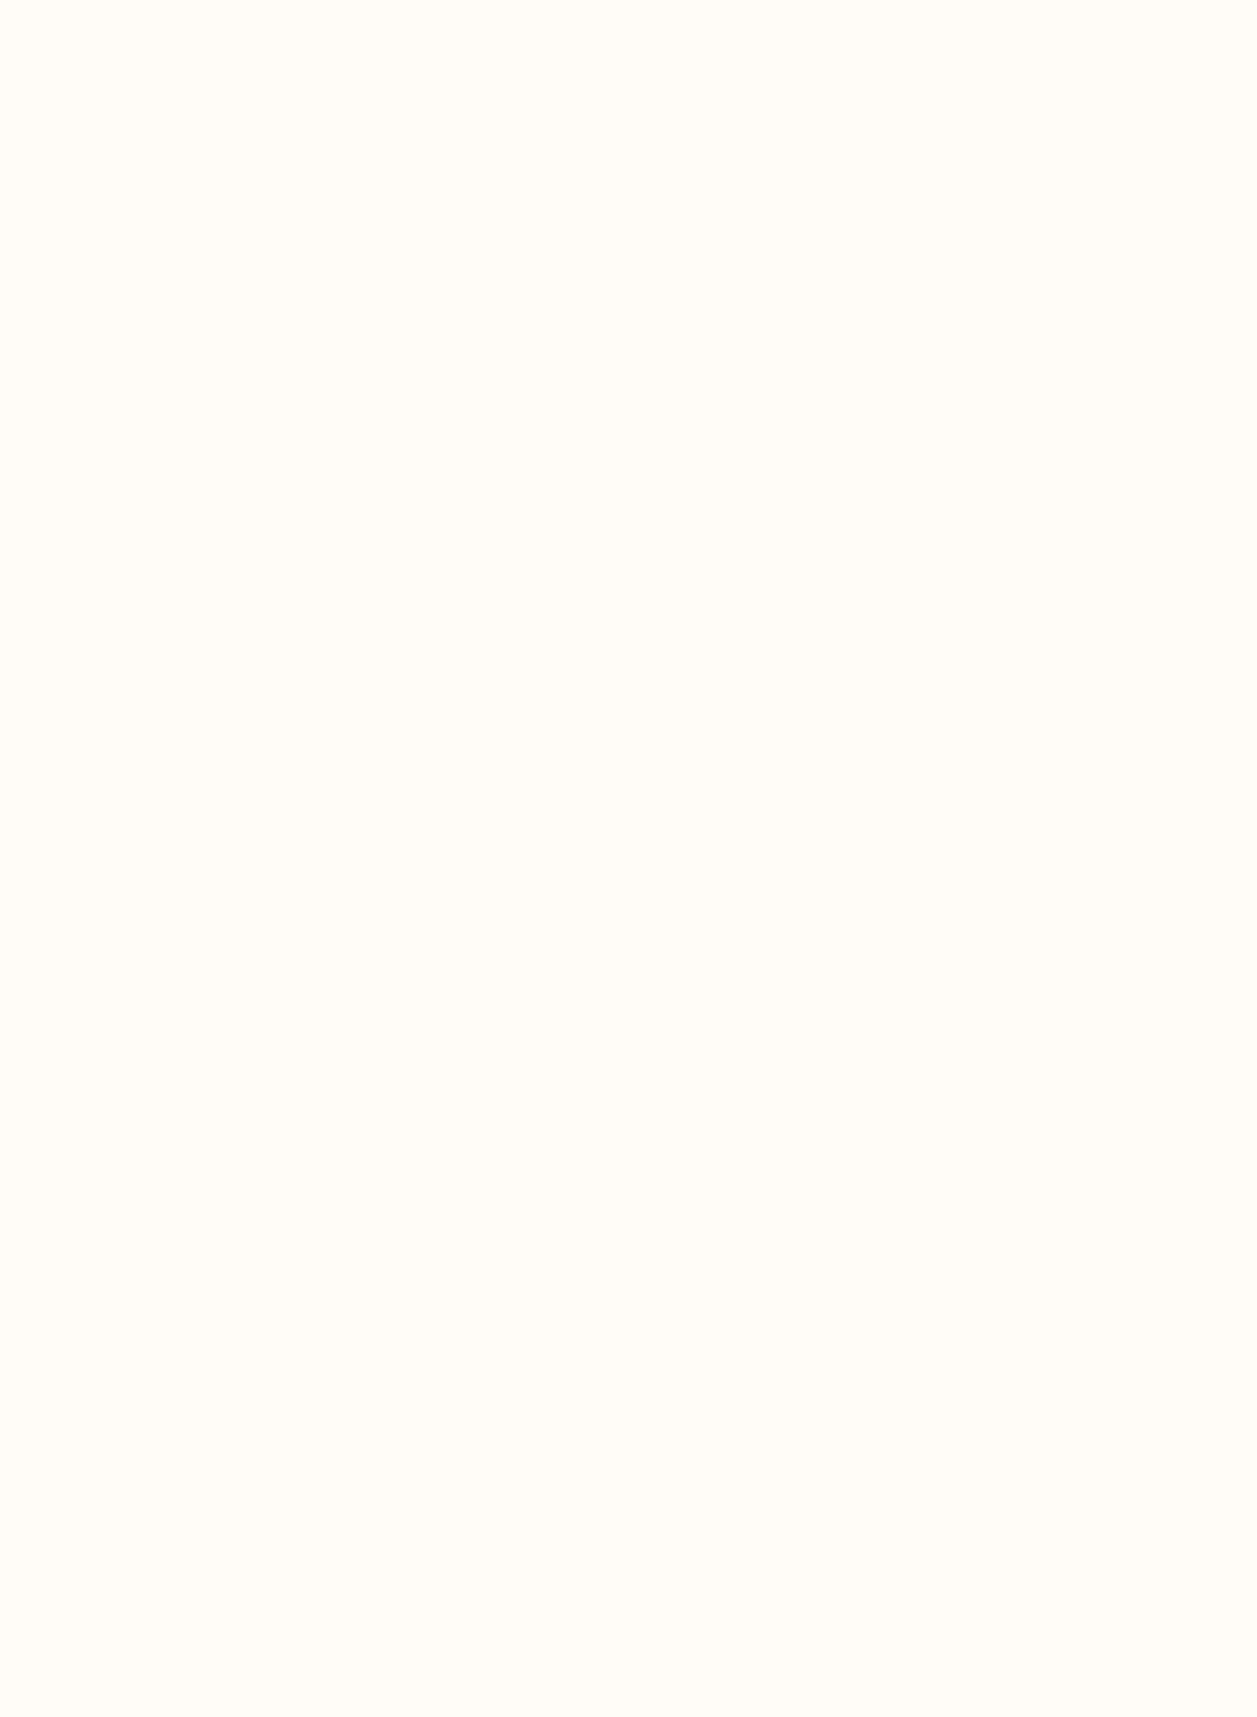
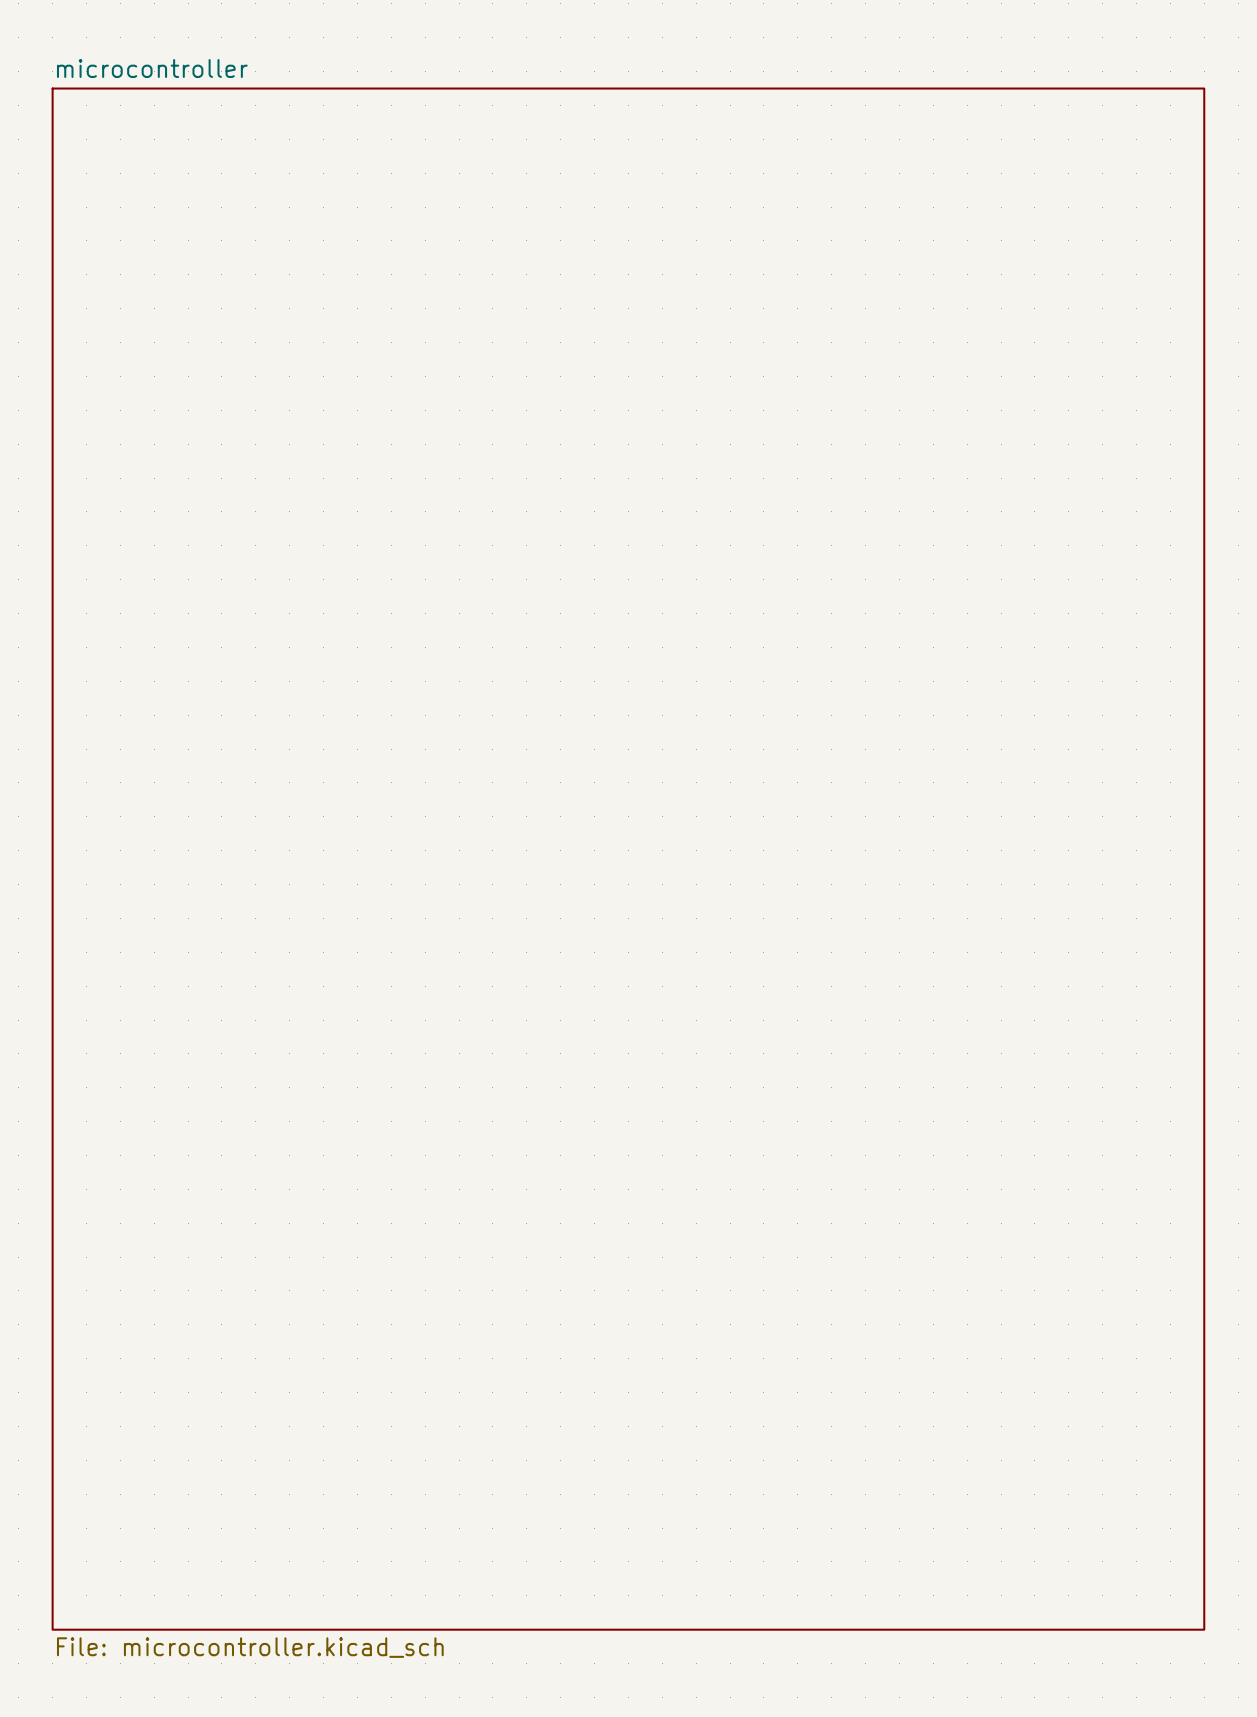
sheet microcontroller: none -> File: microcontroller.kicad_sch (628, 859)

